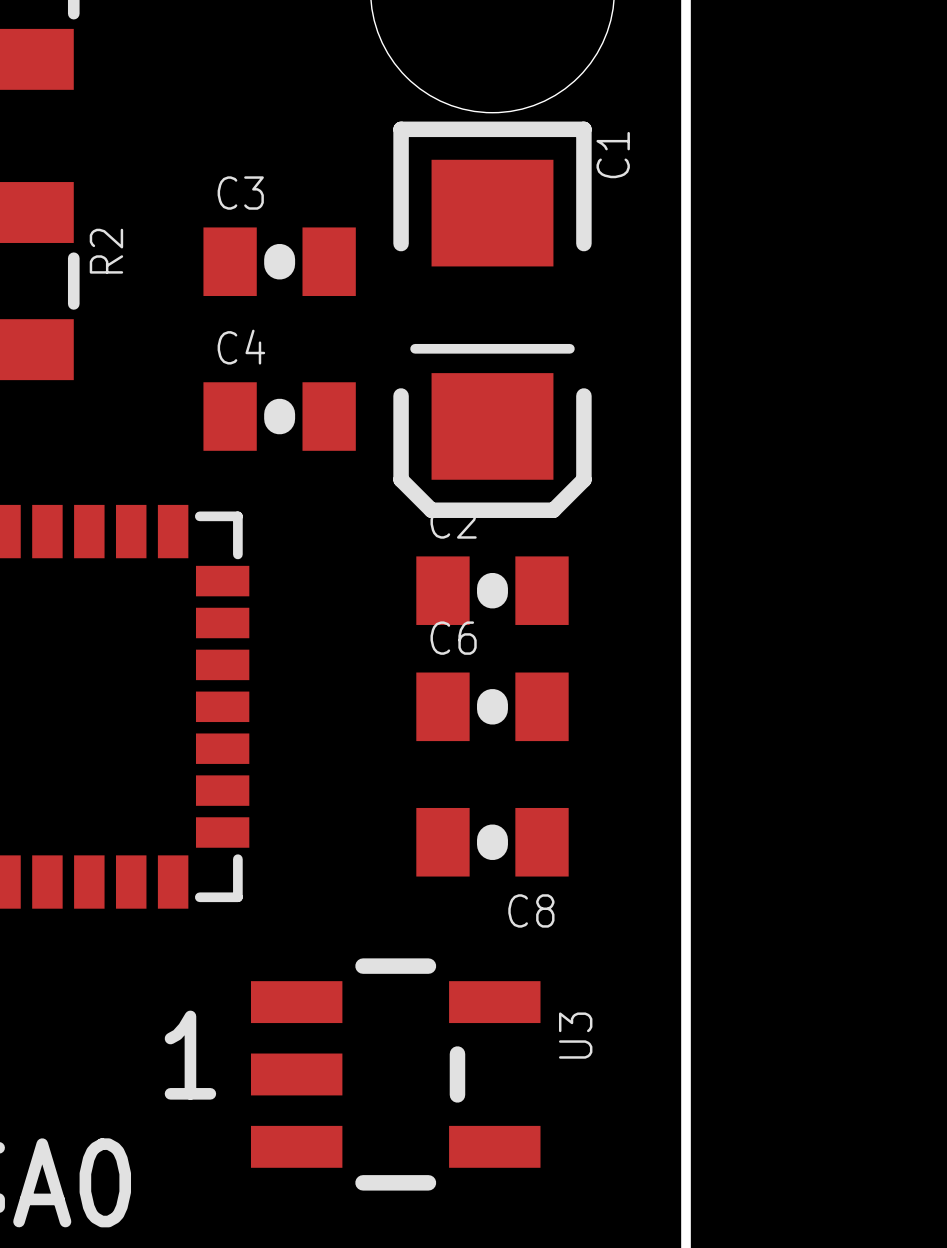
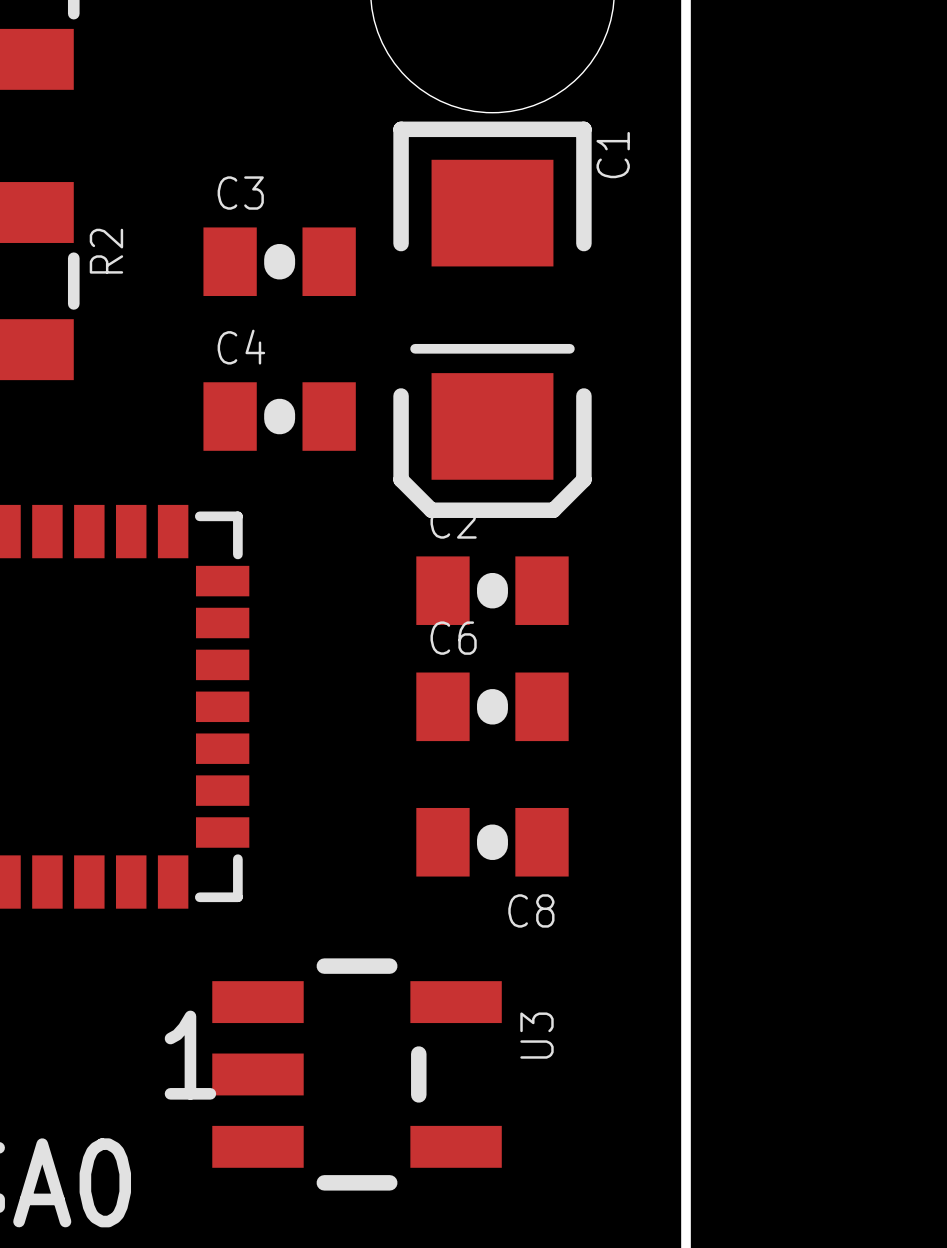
U3 position: (395, 1074) -> (357, 1074)

